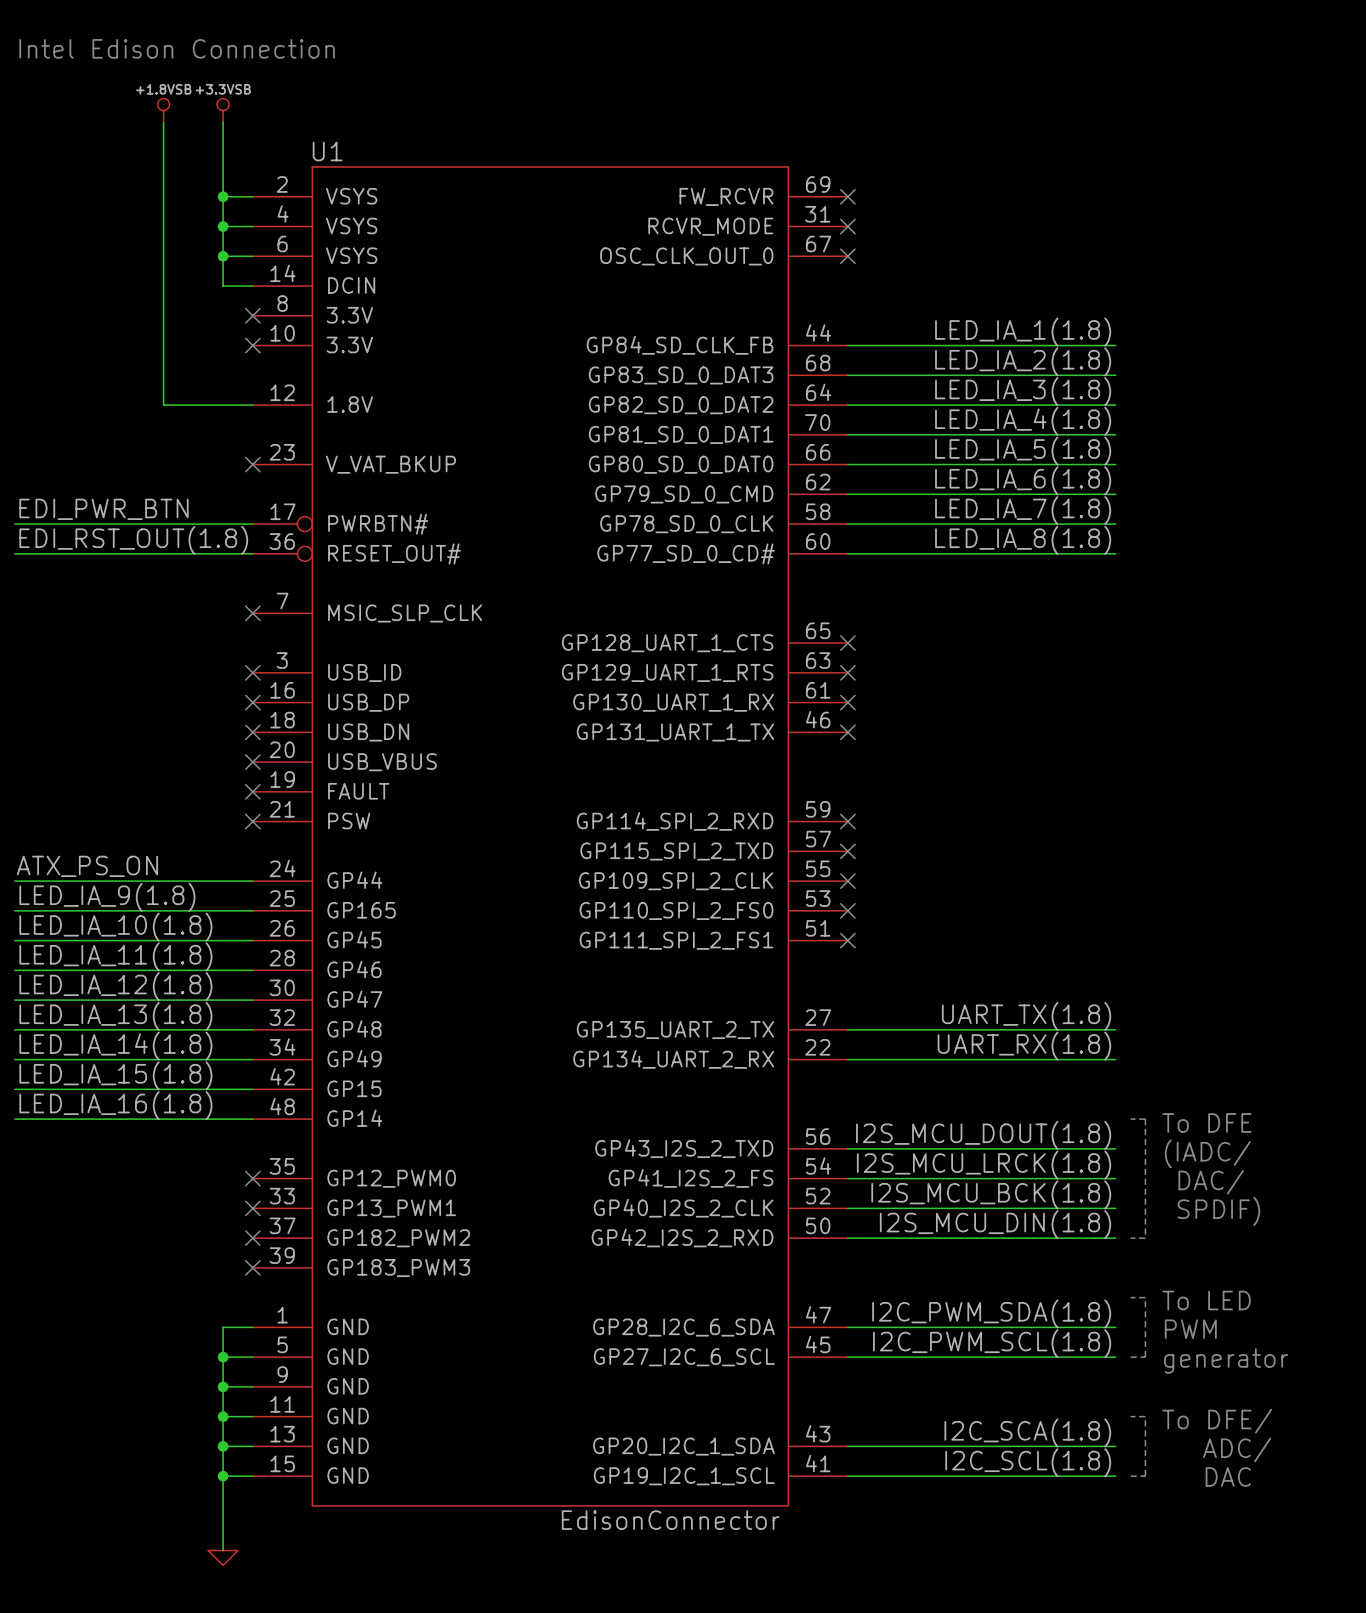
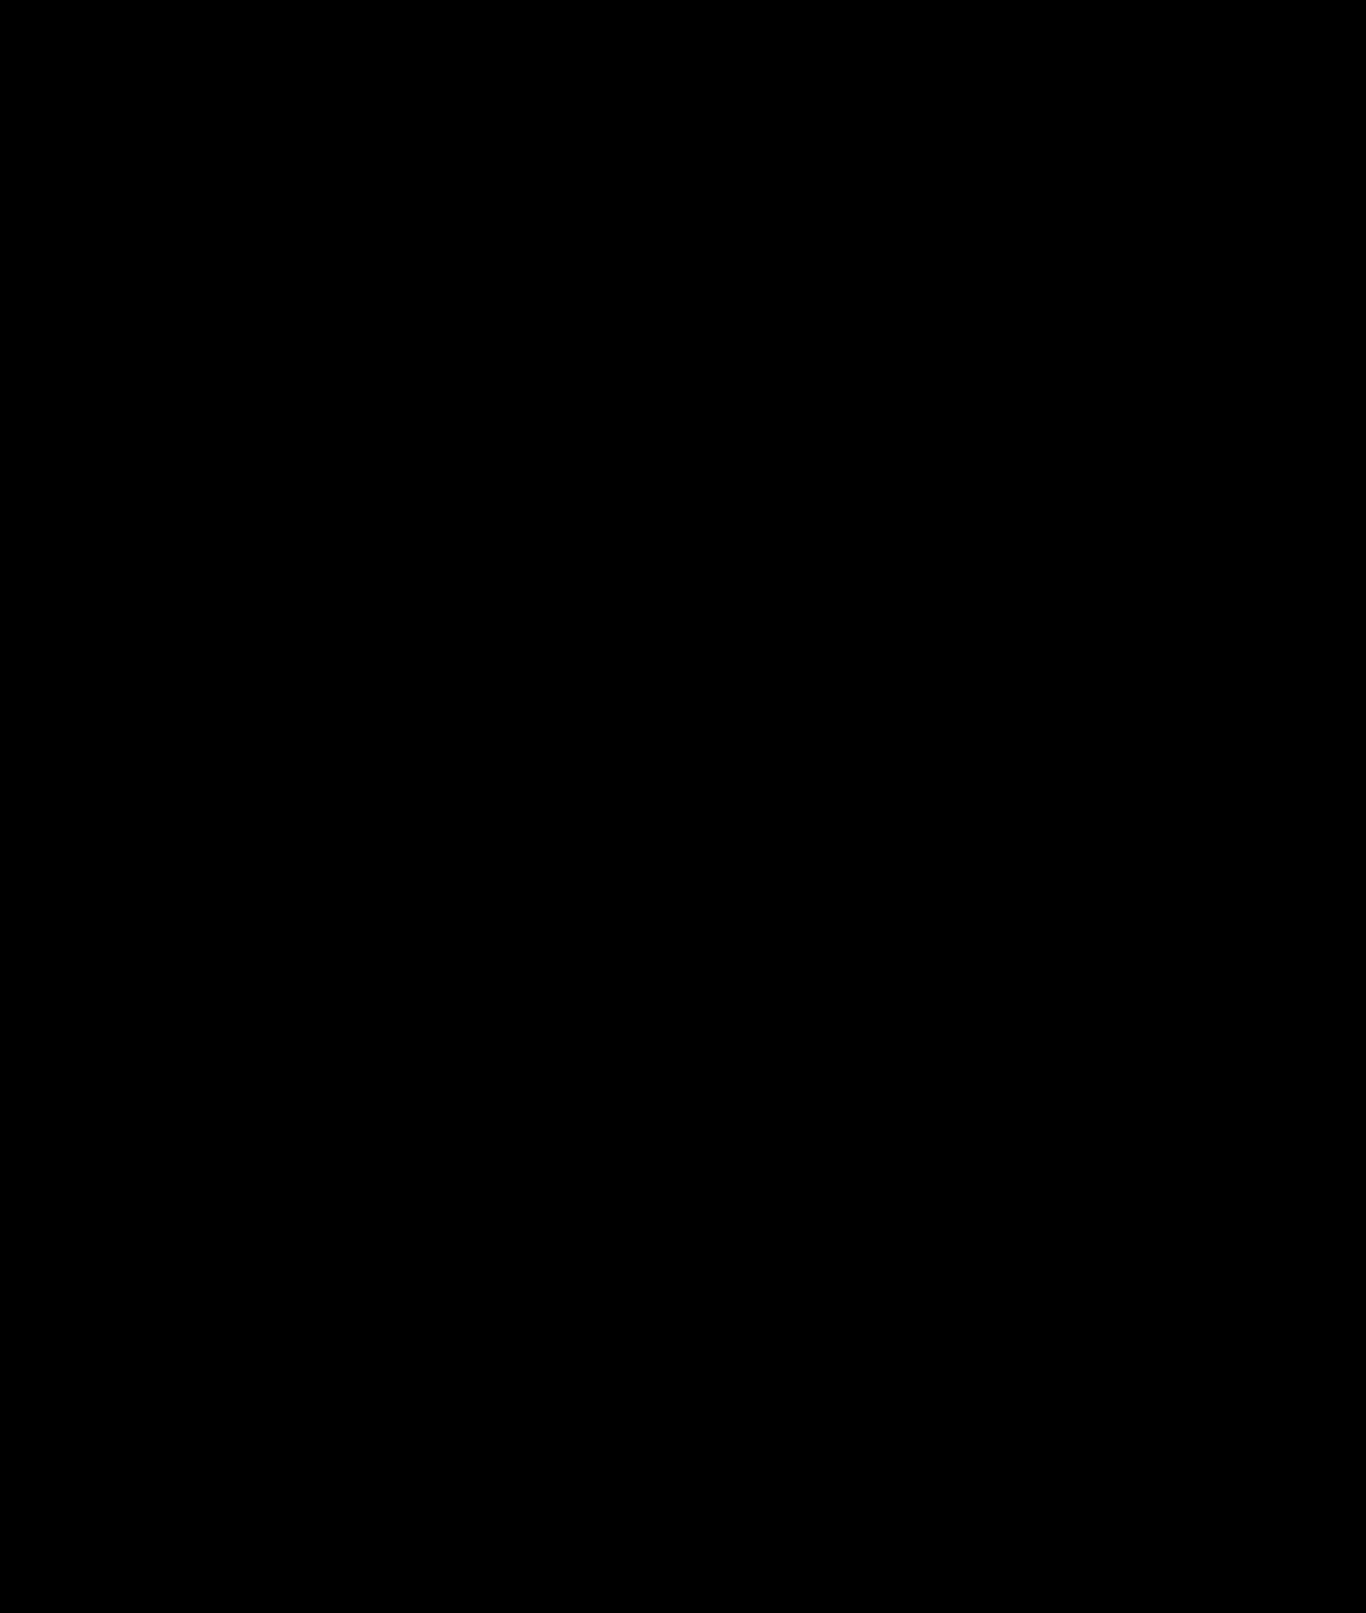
text: Intel Edison Connection (177, 48) -> none
power symbol: +1.8VSB (163, 110) -> none
power symbol: +3.3VSB (223, 110) -> none
wire: (163, 122) (163, 405) (252, 405) -> none
wire: (223, 122) (223, 286) (252, 286) -> none
wire: (223, 196) (252, 196) -> none
junction: (223, 196) -> none
no-connect mark: (847, 196) -> none
wire: (223, 226) (252, 226) -> none
junction: (223, 226) -> none
no-connect mark: (847, 226) -> none
wire: (223, 256) (252, 256) -> none
junction: (223, 256) -> none
no-connect mark: (847, 256) -> none
no-connect mark: (252, 315) -> none
label: LED_IA_1(1.8) (1023, 332) -> none
no-connect mark: (252, 345) -> none
wire: (847, 345) (1115, 345) -> none
label: LED_IA_2(1.8) (1023, 361) -> none
wire: (847, 375) (1115, 375) -> none
label: LED_IA_3(1.8) (1023, 391) -> none
wire: (847, 405) (1115, 405) -> none
label: LED_IA_4(1.8) (1023, 421) -> none
wire: (847, 434) (1115, 434) -> none
label: LED_IA_5(1.8) (1023, 451) -> none
no-connect mark: (252, 464) -> none
wire: (847, 464) (1115, 464) -> none
label: LED_IA_6(1.8) (1023, 480) -> none
wire: (847, 494) (1115, 494) -> none
label: EDI_PWR_BTN (103, 509) -> none
label: LED_IA_7(1.8) (1023, 510) -> none
wire: (14, 524) (252, 524) -> none
wire: (847, 524) (1115, 524) -> none
label: EDI_RST_OUT(1.8) (133, 540) -> none
label: LED_IA_8(1.8) (1023, 540) -> none
wire: (14, 553) (252, 553) -> none
wire: (847, 553) (1115, 553) -> none
no-connect mark: (252, 613) -> none
no-connect mark: (847, 643) -> none
no-connect mark: (252, 672) -> none
no-connect mark: (847, 672) -> none
no-connect mark: (252, 702) -> none
no-connect mark: (847, 702) -> none
no-connect mark: (252, 732) -> none
no-connect mark: (847, 732) -> none
no-connect mark: (252, 762) -> none
no-connect mark: (252, 791) -> none
no-connect mark: (252, 821) -> none
no-connect mark: (847, 821) -> none
U1: EdisonConnector (550, 836) -> none
no-connect mark: (847, 851) -> none
label: ATX_PS_ON (87, 866) -> none
wire: (14, 881) (252, 881) -> none
no-connect mark: (847, 881) -> none
label: LED_IA_9(1.8) (107, 897) -> none
wire: (14, 910) (252, 910) -> none
no-connect mark: (847, 910) -> none
label: LED_IA_10(1.8) (115, 927) -> none
wire: (14, 940) (252, 940) -> none
no-connect mark: (847, 940) -> none
label: LED_IA_11(1.8) (115, 956) -> none
wire: (14, 970) (252, 970) -> none
label: LED_IA_12(1.8) (115, 986) -> none
wire: (14, 1000) (252, 1000) -> none
label: LED_IA_13(1.8) (115, 1016) -> none
label: UART_TX(1.8) (1026, 1016) -> none
wire: (14, 1029) (252, 1029) -> none
wire: (847, 1029) (1115, 1029) -> none
label: LED_IA_14(1.8) (115, 1046) -> none
label: UART_RX(1.8) (1024, 1046) -> none
wire: (14, 1059) (252, 1059) -> none
wire: (847, 1059) (1115, 1059) -> none
label: LED_IA_15(1.8) (115, 1075) -> none
wire: (14, 1089) (252, 1089) -> none
label: LED_IA_16(1.8) (115, 1105) -> none
wire: (14, 1119) (252, 1119) -> none
line: (1130, 1119) (1145, 1119) (1145, 1238) (1130, 1238) -> none
text: To DFE (1206, 1122) -> none
label: I2S_MCU_DOUT(1.8) (983, 1135) -> none
wire: (847, 1148) (1115, 1148) -> none
text: (IADC/ (1207, 1153) -> none
label: I2S_MCU_LRCK(1.8) (984, 1165) -> none
no-connect mark: (252, 1178) -> none
wire: (847, 1178) (1115, 1178) -> none
text: DAC/ (1211, 1182) -> none
label: I2S_MCU_BCK(1.8) (991, 1194) -> none
no-connect mark: (252, 1208) -> none
wire: (847, 1208) (1115, 1208) -> none
text: SPDIF) (1218, 1211) -> none
label: I2S_MCU_DIN(1.8) (995, 1224) -> none
no-connect mark: (252, 1238) -> none
wire: (847, 1238) (1115, 1238) -> none
no-connect mark: (252, 1267) -> none
line: (1130, 1297) (1145, 1297) (1145, 1357) (1130, 1357) -> none
text: To LED (1206, 1300) -> none
label: I2C_PWM_SDA(1.8) (991, 1313) -> none
wire: (252, 1327) (223, 1327) (223, 1550) -> none
wire: (847, 1327) (1115, 1327) -> none
text: PWM (1190, 1329) -> none
label: I2C_PWM_SCL(1.8) (992, 1343) -> none
wire: (223, 1357) (252, 1357) -> none
junction: (223, 1357) -> none
wire: (847, 1357) (1115, 1357) -> none
text: generator (1226, 1360) -> none
wire: (223, 1386) (252, 1386) -> none
junction: (223, 1386) -> none
wire: (223, 1416) (252, 1416) -> none
junction: (223, 1416) -> none
line: (1130, 1416) (1145, 1416) (1145, 1476) (1130, 1476) -> none
text: To DFE/ (1217, 1421) -> none
label: I2C_SCA(1.8) (1027, 1432) -> none
wire: (223, 1446) (252, 1446) -> none
junction: (223, 1446) -> none
wire: (847, 1446) (1115, 1446) -> none
text: ADC/ (1237, 1449) -> none
label: I2C_SCL(1.8) (1028, 1462) -> none
wire: (223, 1476) (252, 1476) -> none
junction: (223, 1476) -> none
wire: (847, 1476) (1115, 1476) -> none
text: DAC (1228, 1476) -> none
power symbol: (223, 1557) -> none

